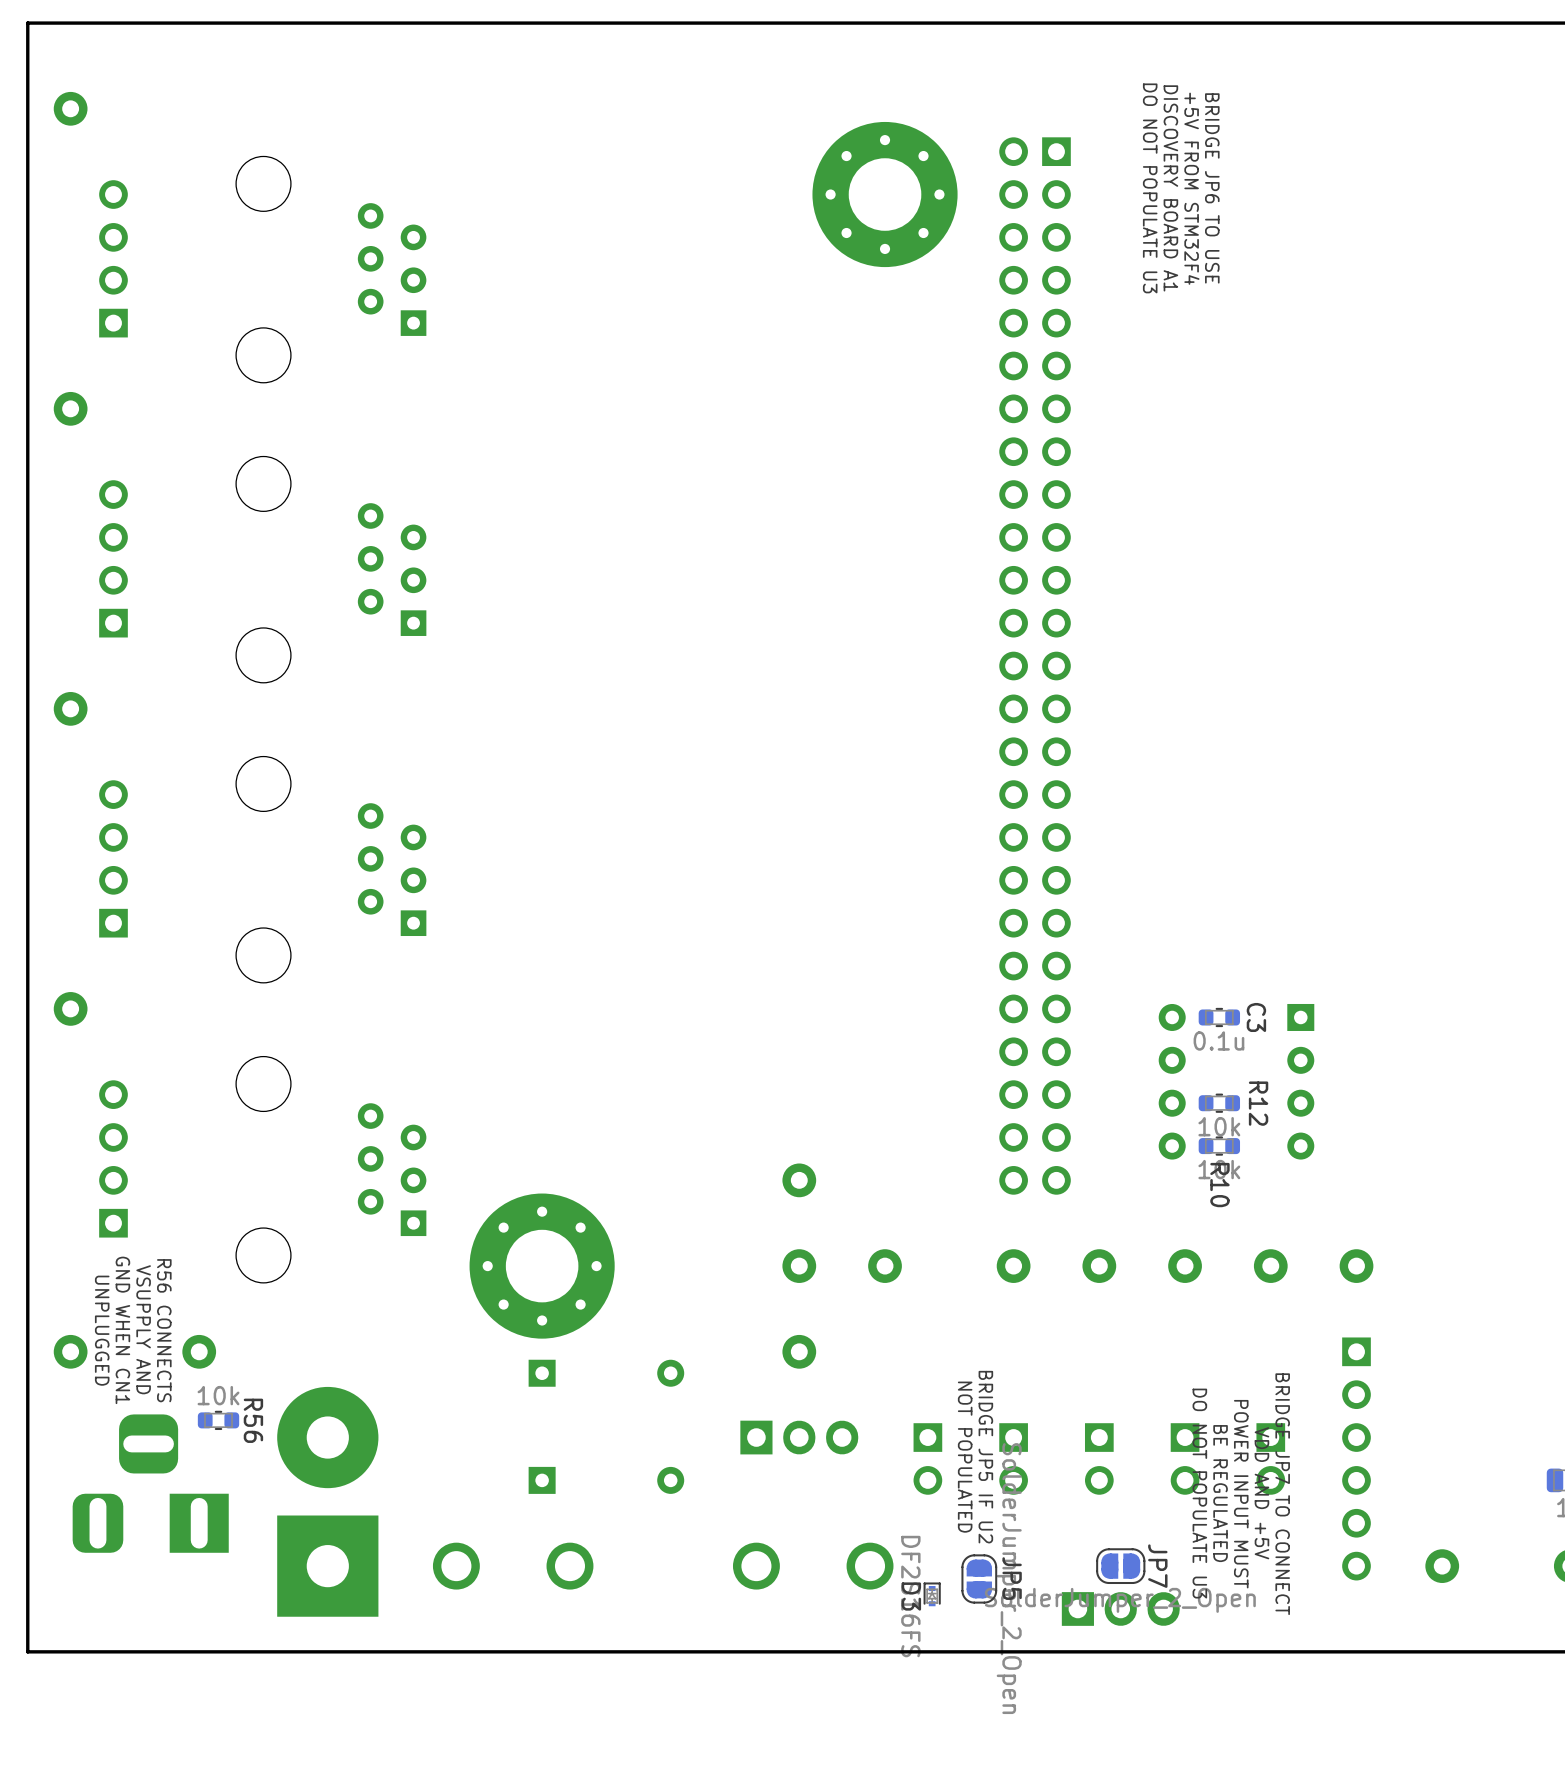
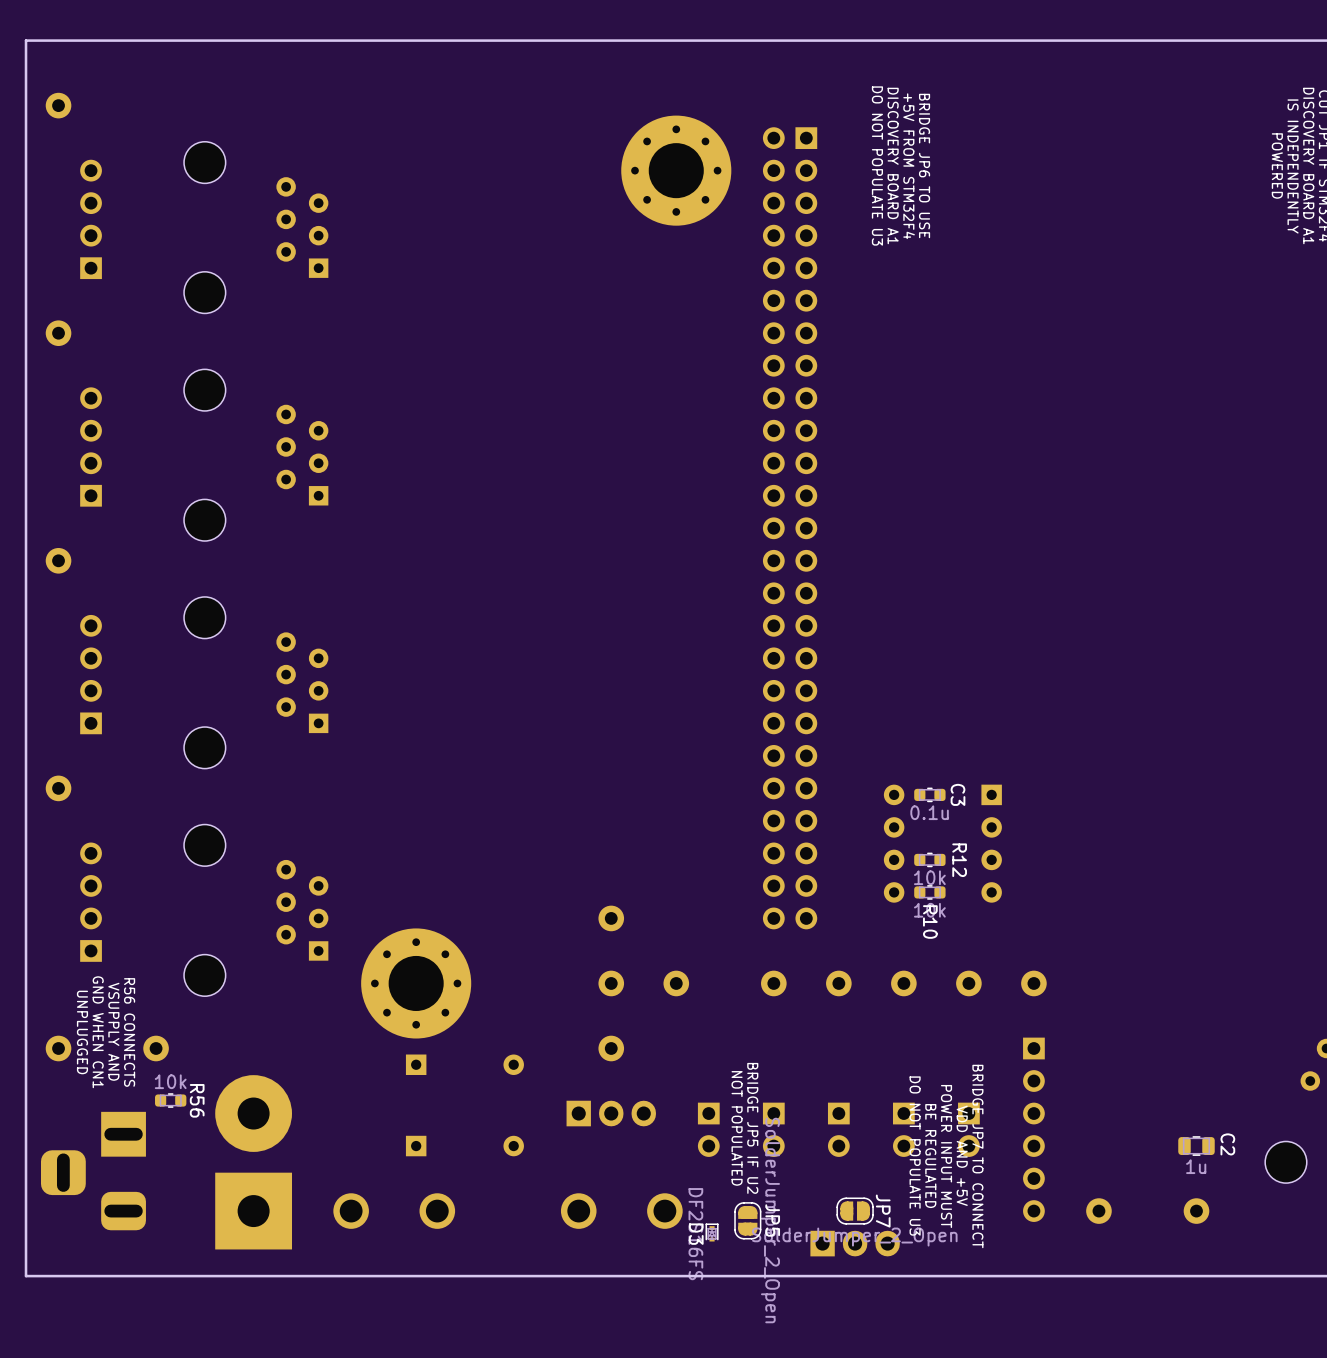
part rotation: 0° (150, 1483) -> 90° counterclockwise (93, 1171)

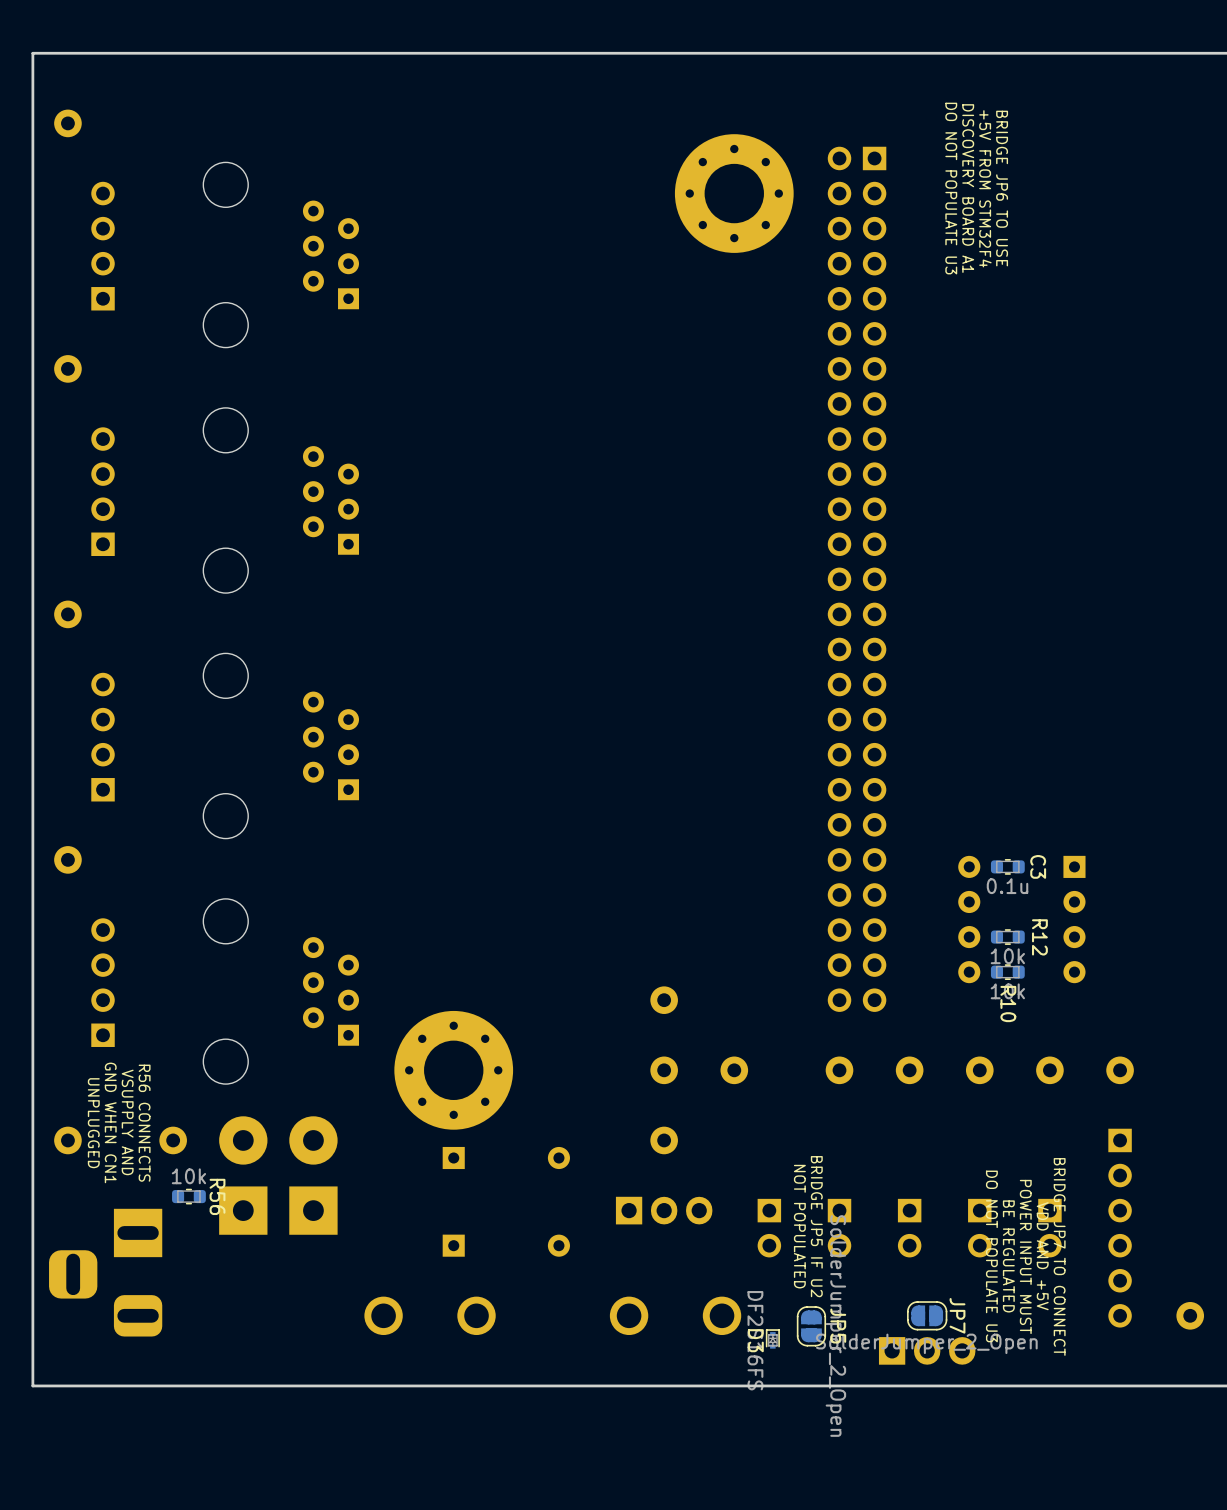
part: none -> (243, 1175)
part: none -> (313, 1175)
part: (253, 1162) -> none

